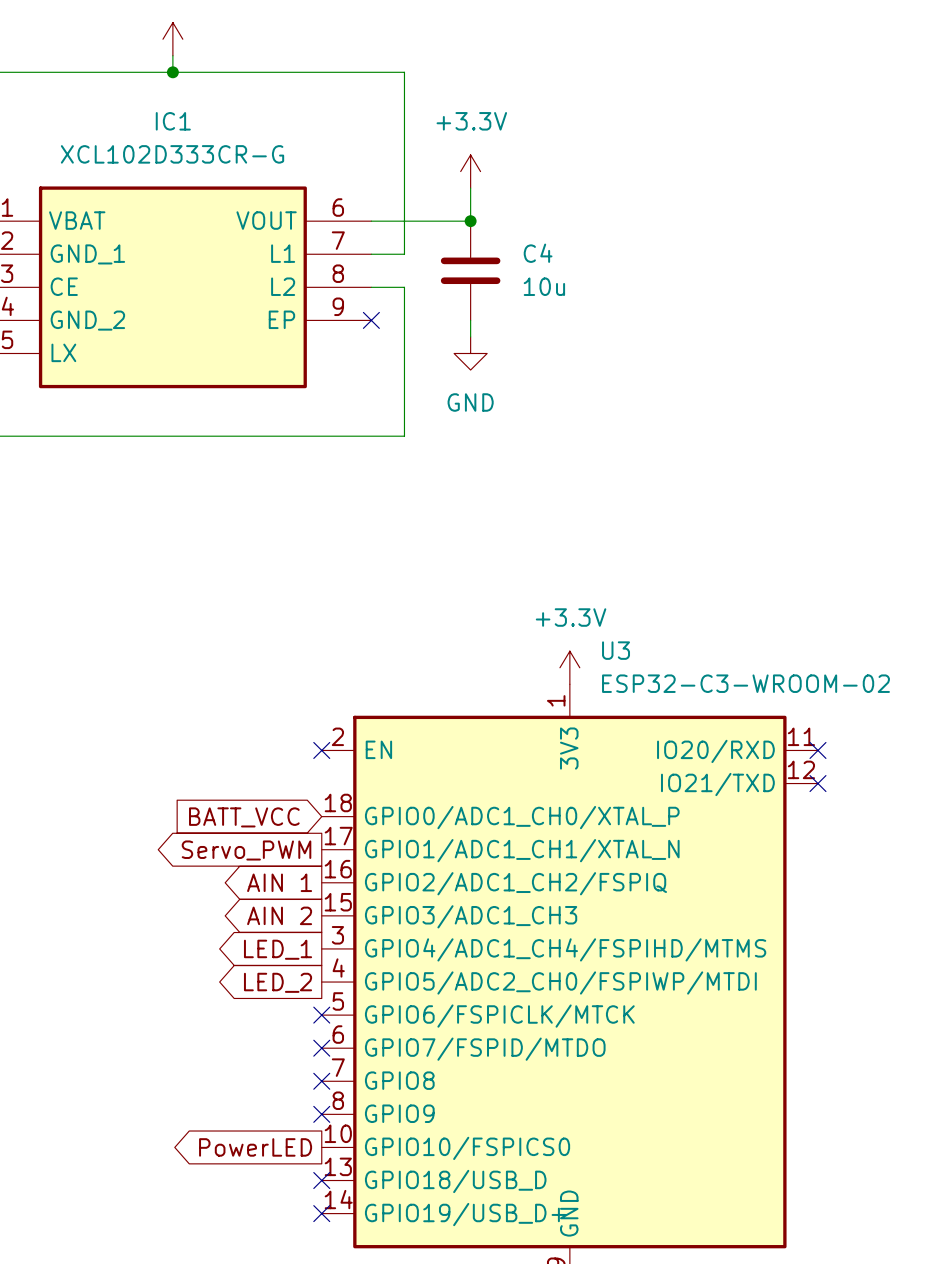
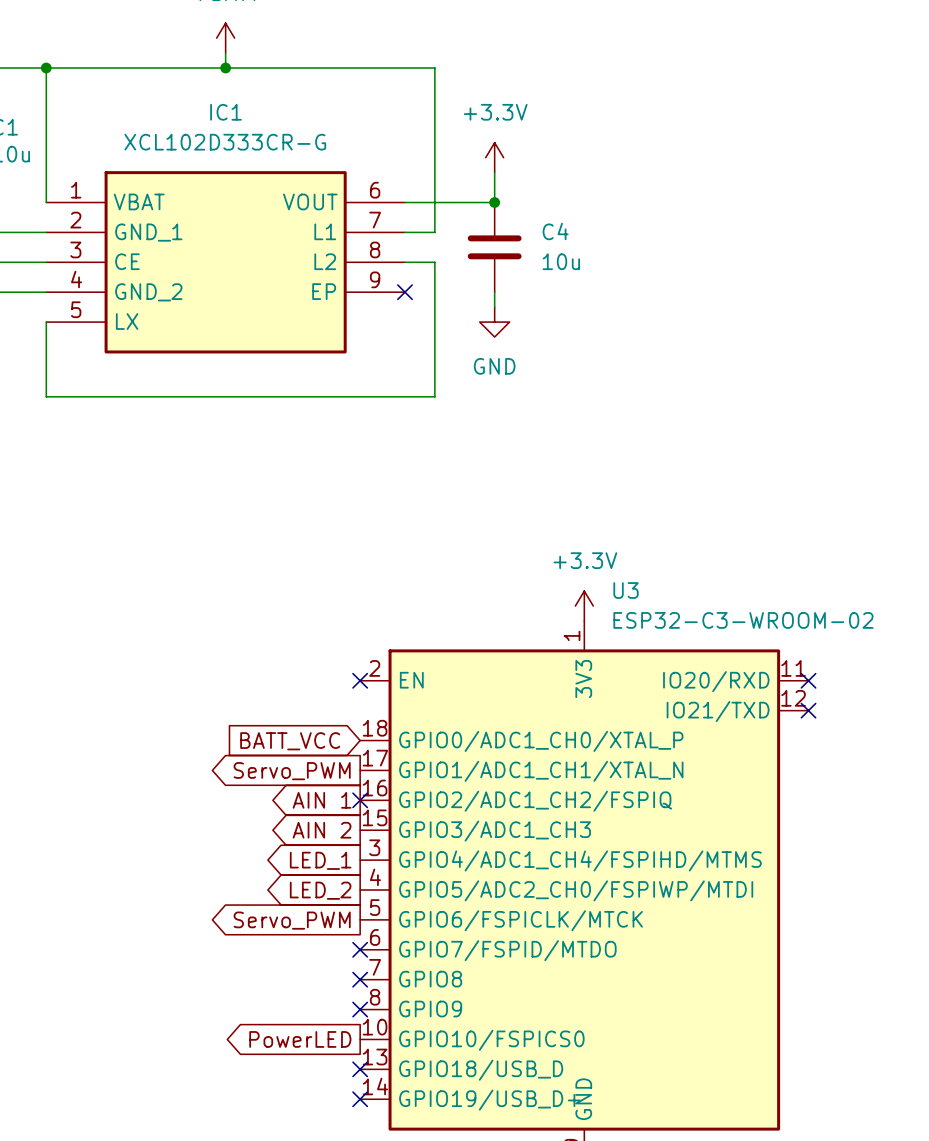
no-connect mark: none -> (360, 800)
global label: none -> Servo_PWM (292, 920)
no-connect mark: (321, 1015) -> none

